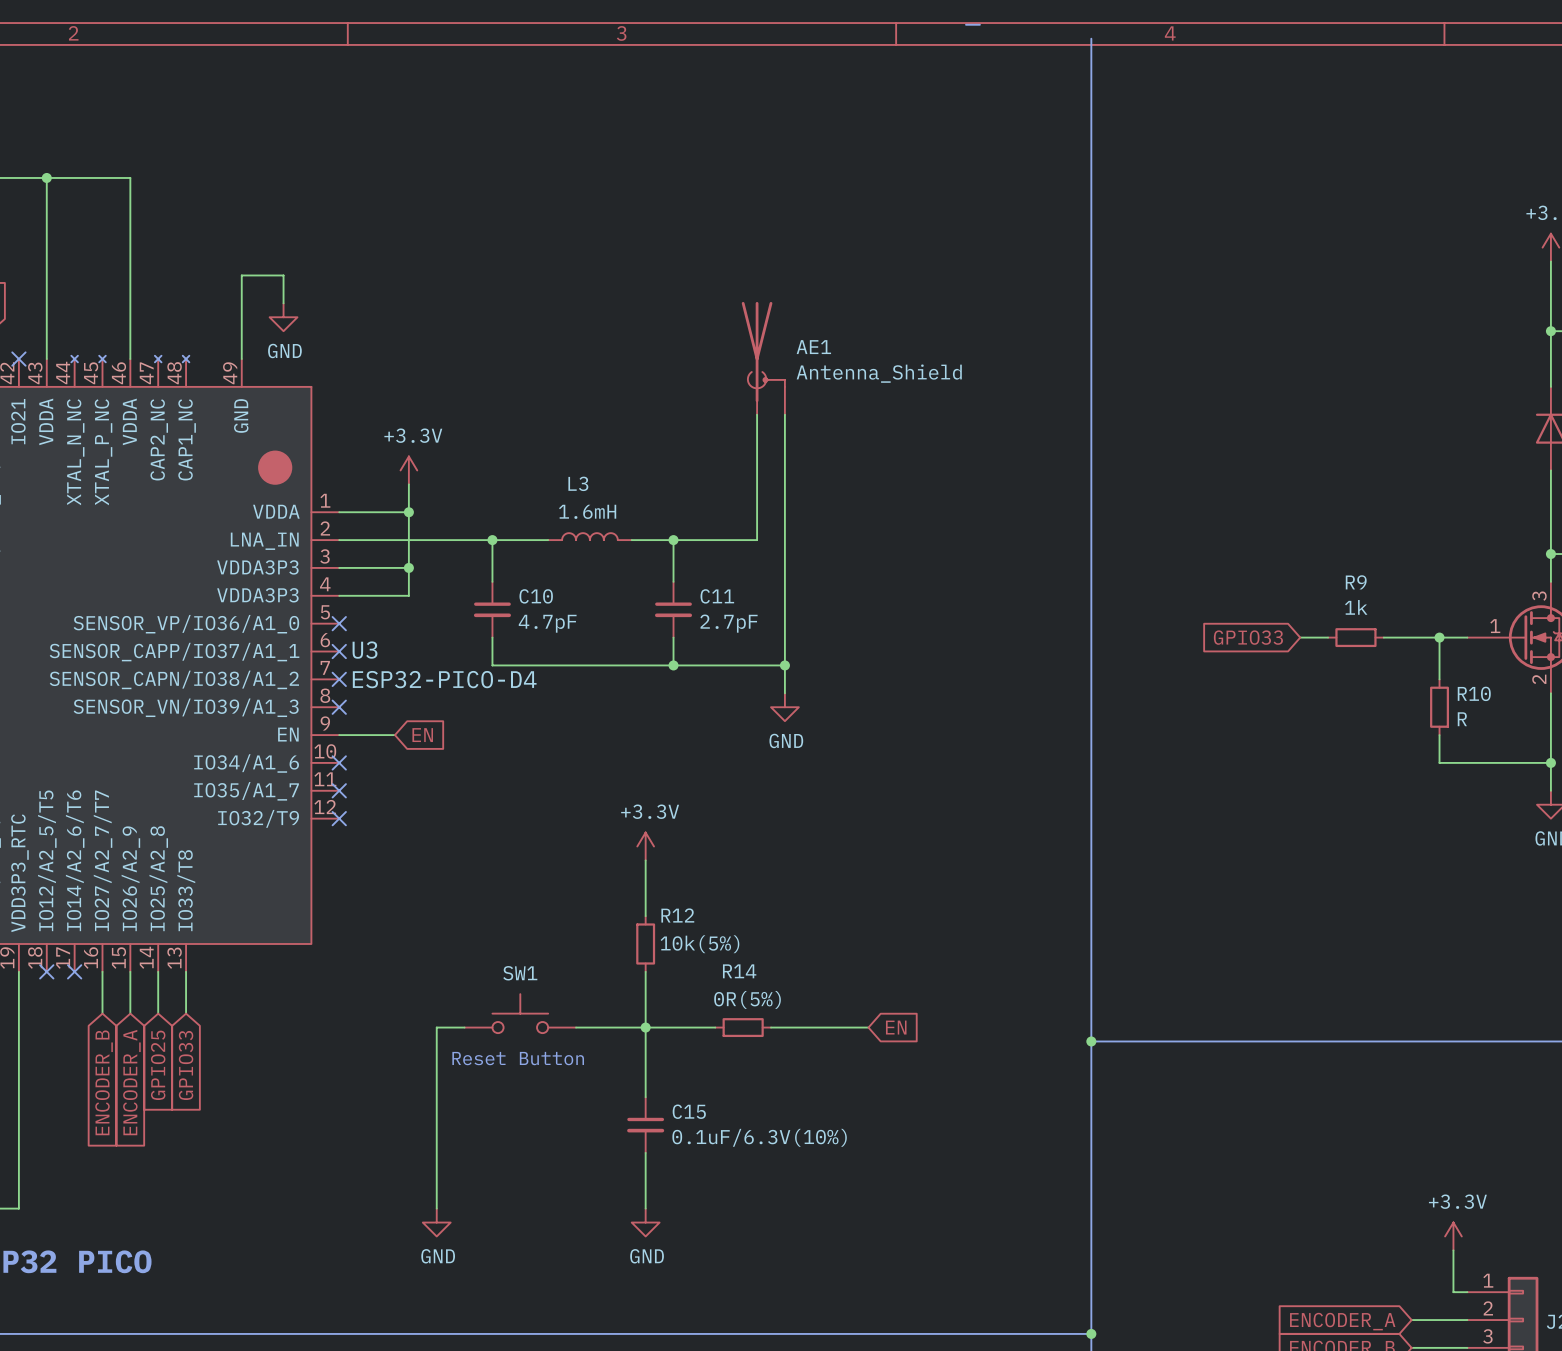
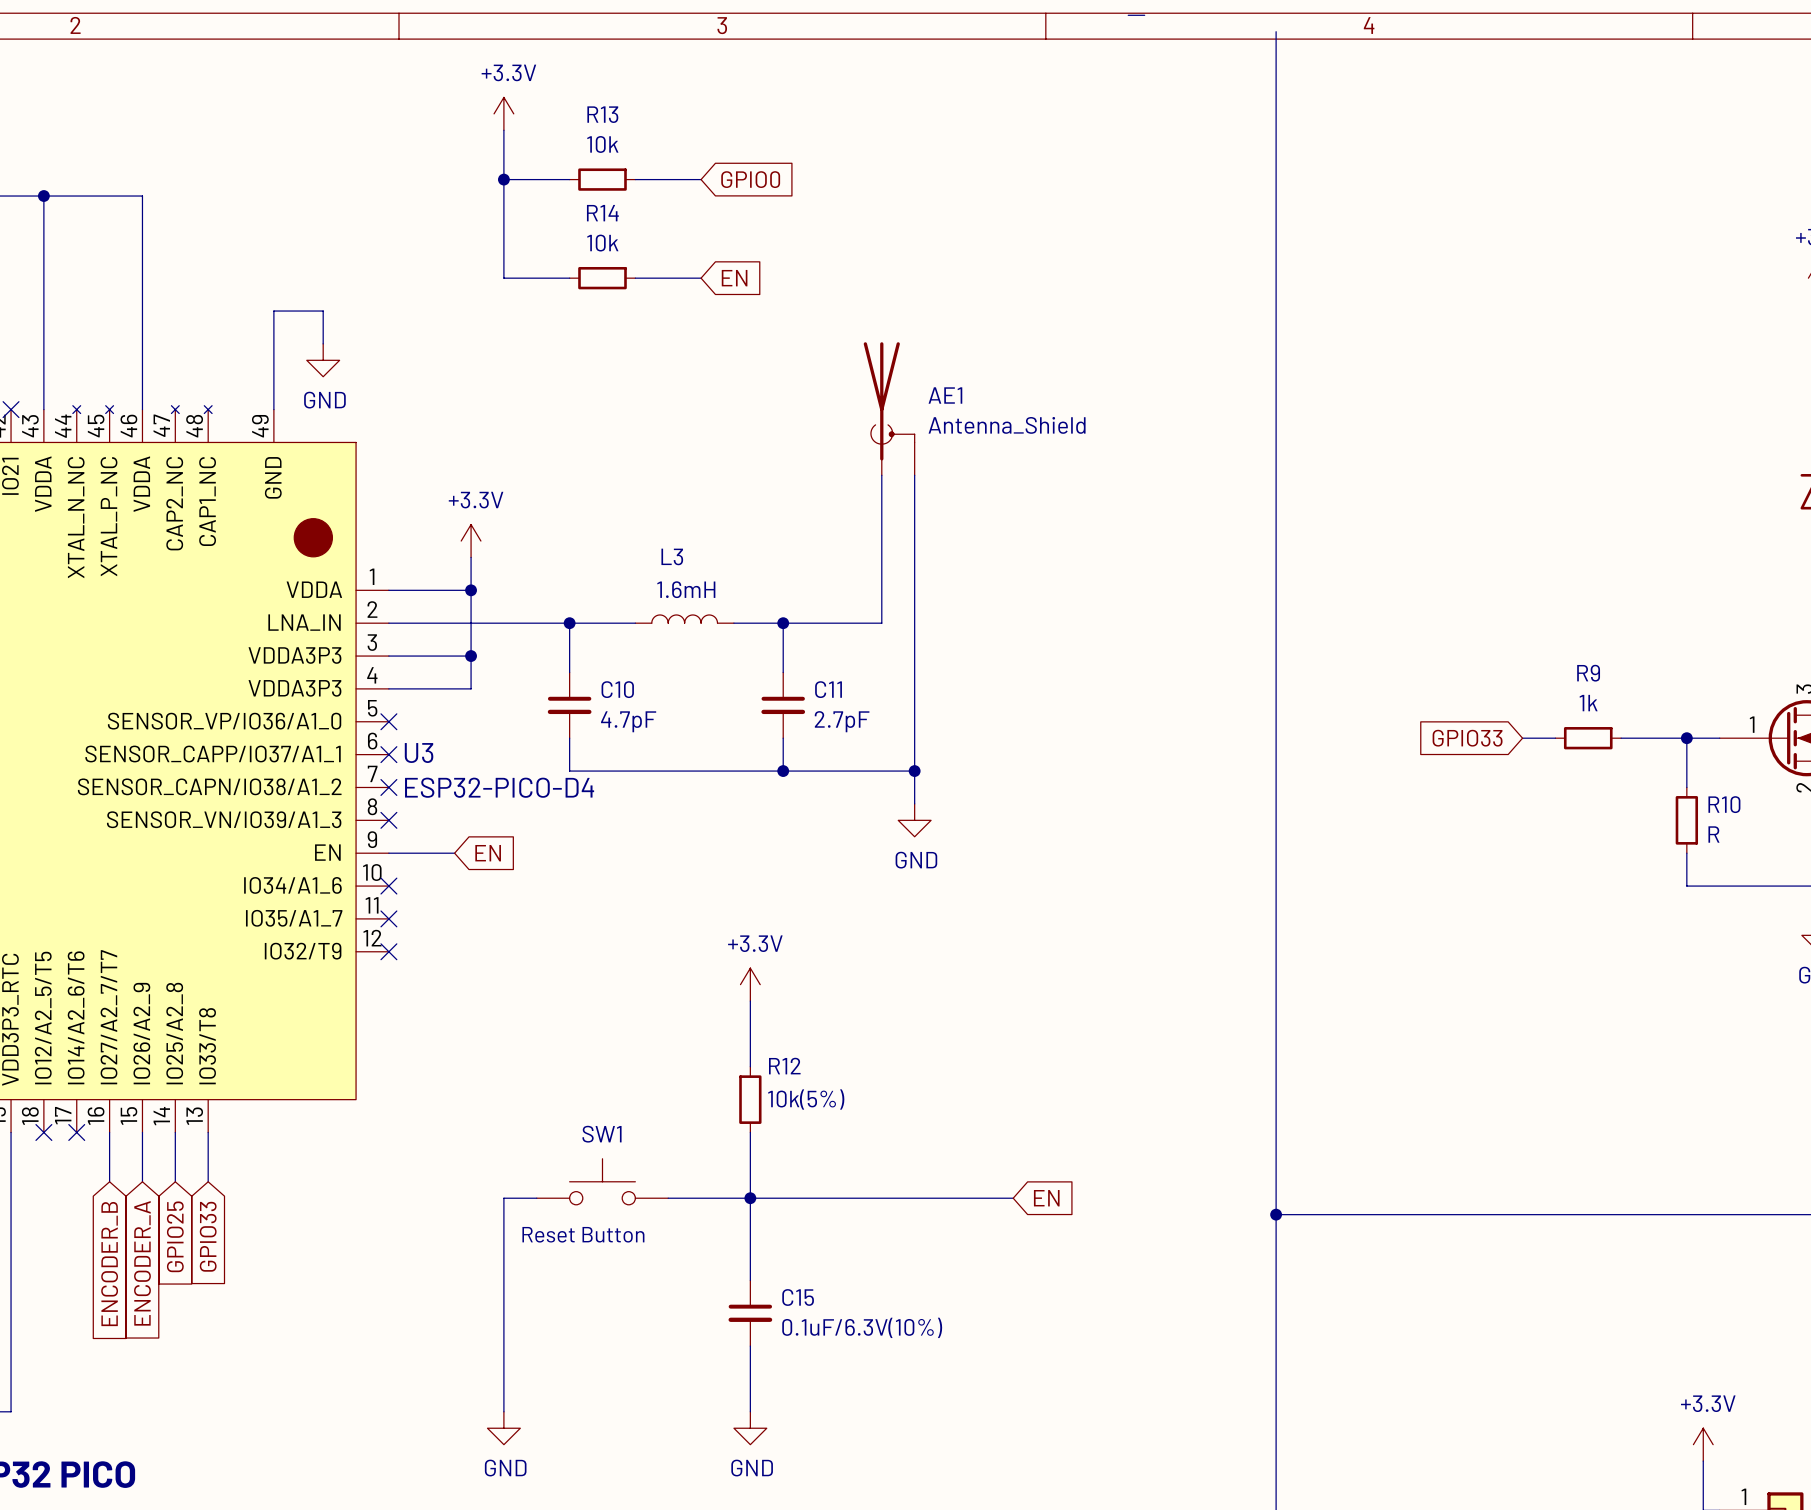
power symbol: none -> +3.3V (503, 113)
wire: none -> (503, 130) (503, 278) (569, 278)
wire: none -> (503, 179) (569, 179)
junction: none -> (503, 179)
R13: none -> 10k (602, 179)
wire: none -> (635, 179) (701, 179)
global label: none -> GPIO0 (750, 179)
wire: none -> (635, 278) (701, 278)
global label: none -> EN (734, 278)
R14 name position: R14 (739, 971) -> R14 (602, 213)
R14 value: 0R(5%) (747, 999) -> 10k (602, 243)
wire: none -> (832, 1198) (898, 1198)
R14 position: (743, 1027) -> (602, 278)

